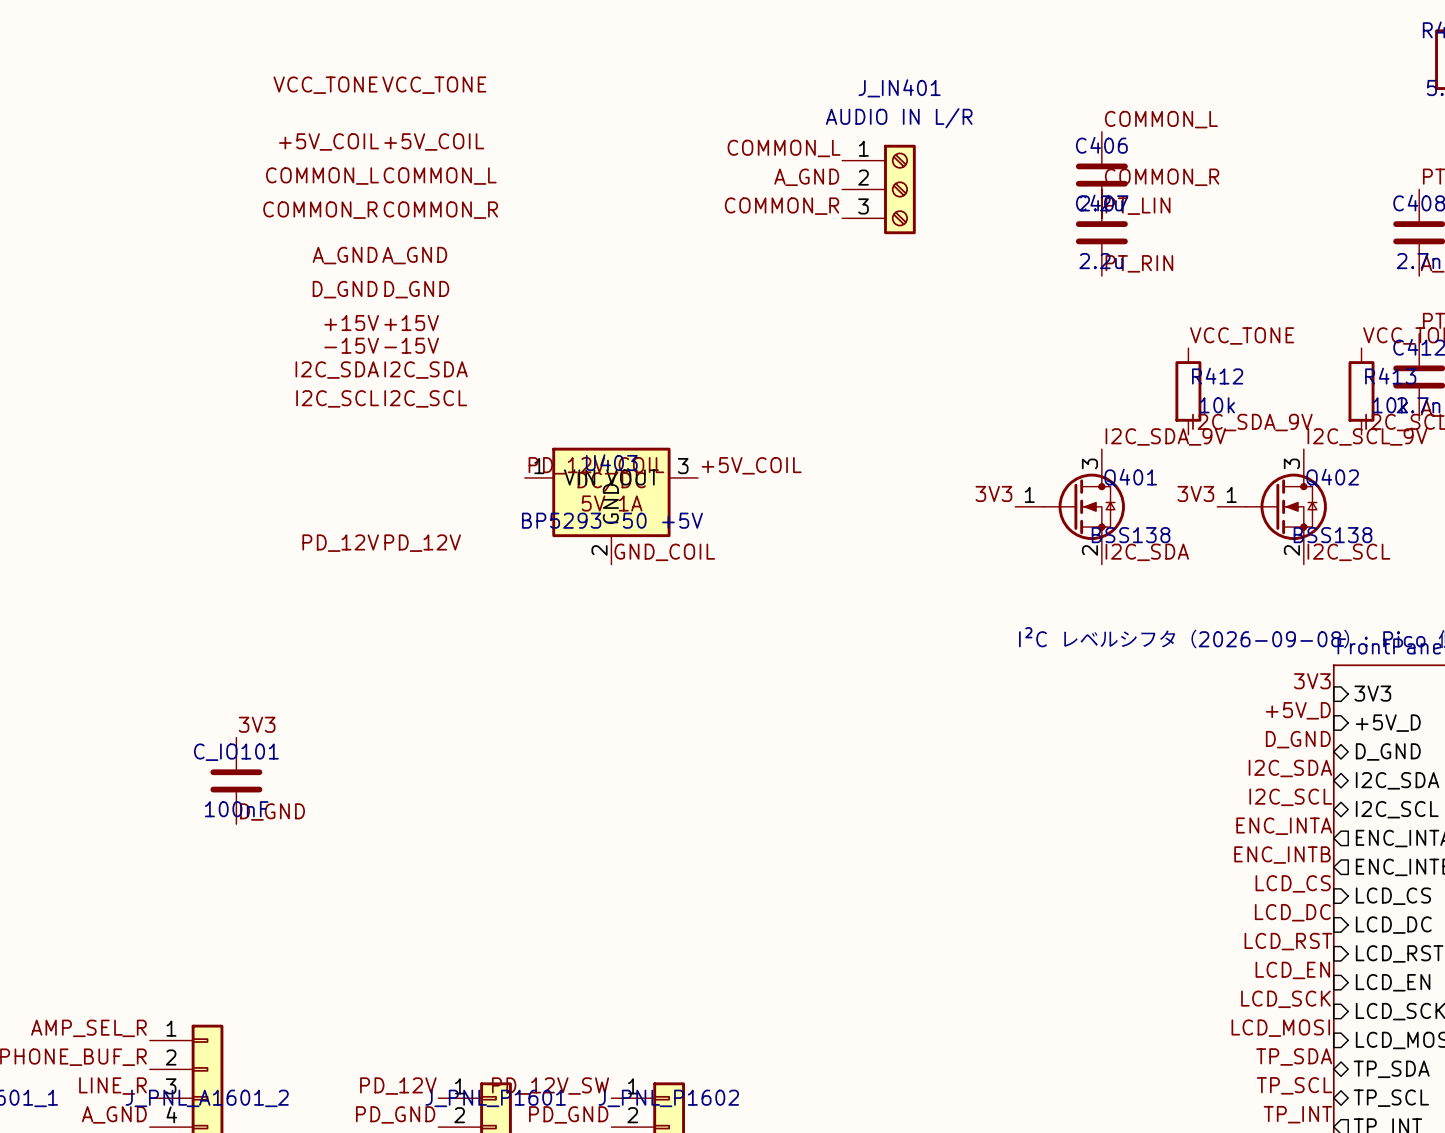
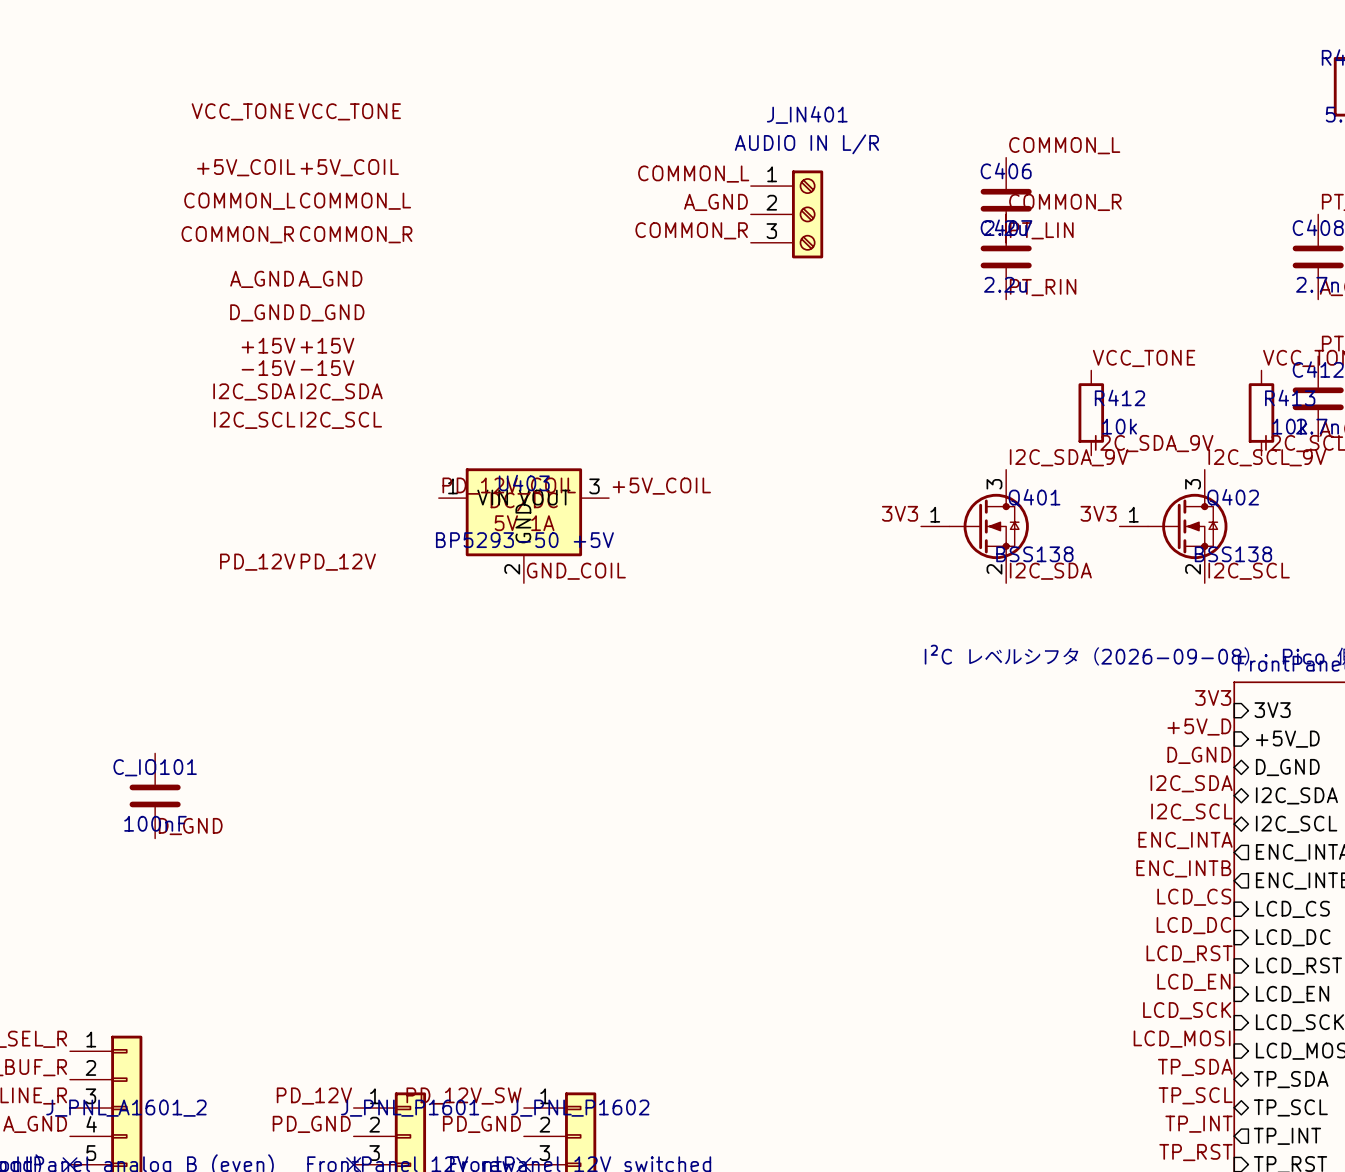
label: 3V3 (257, 724) -> none

